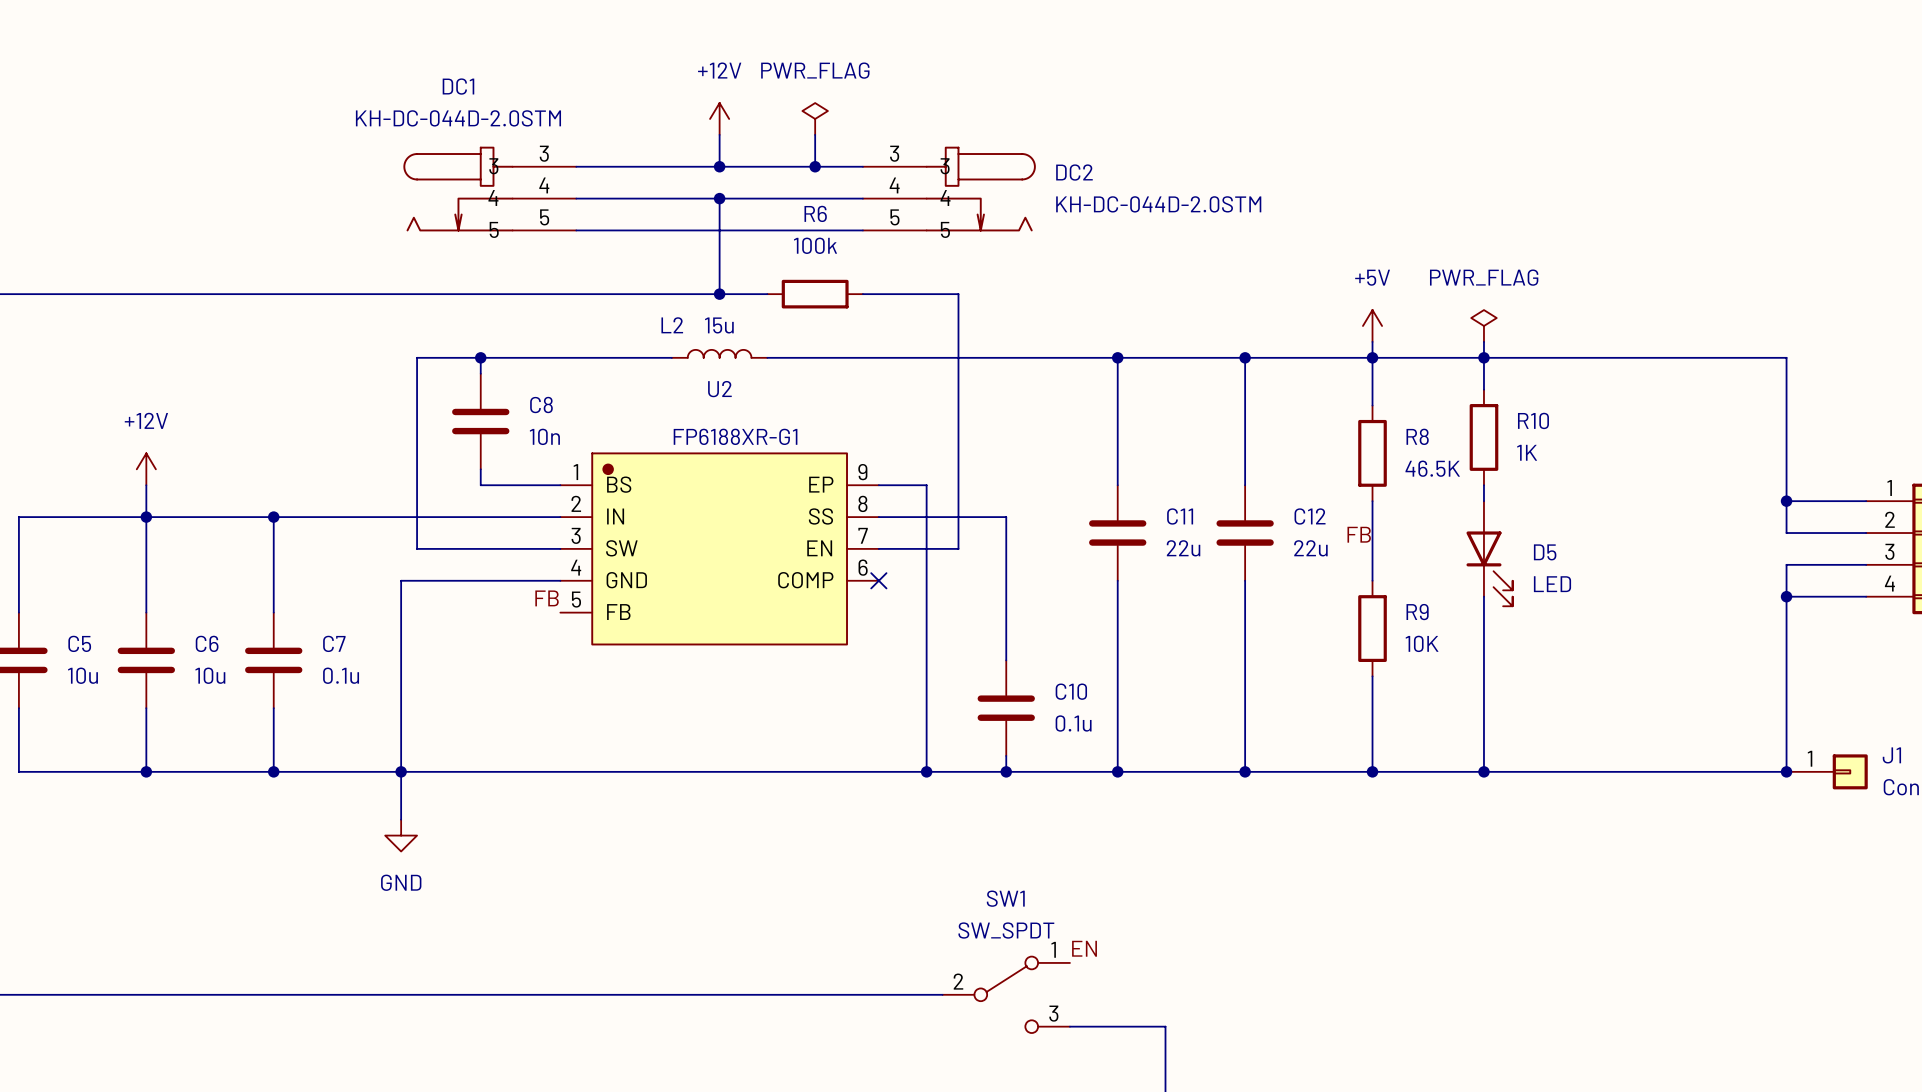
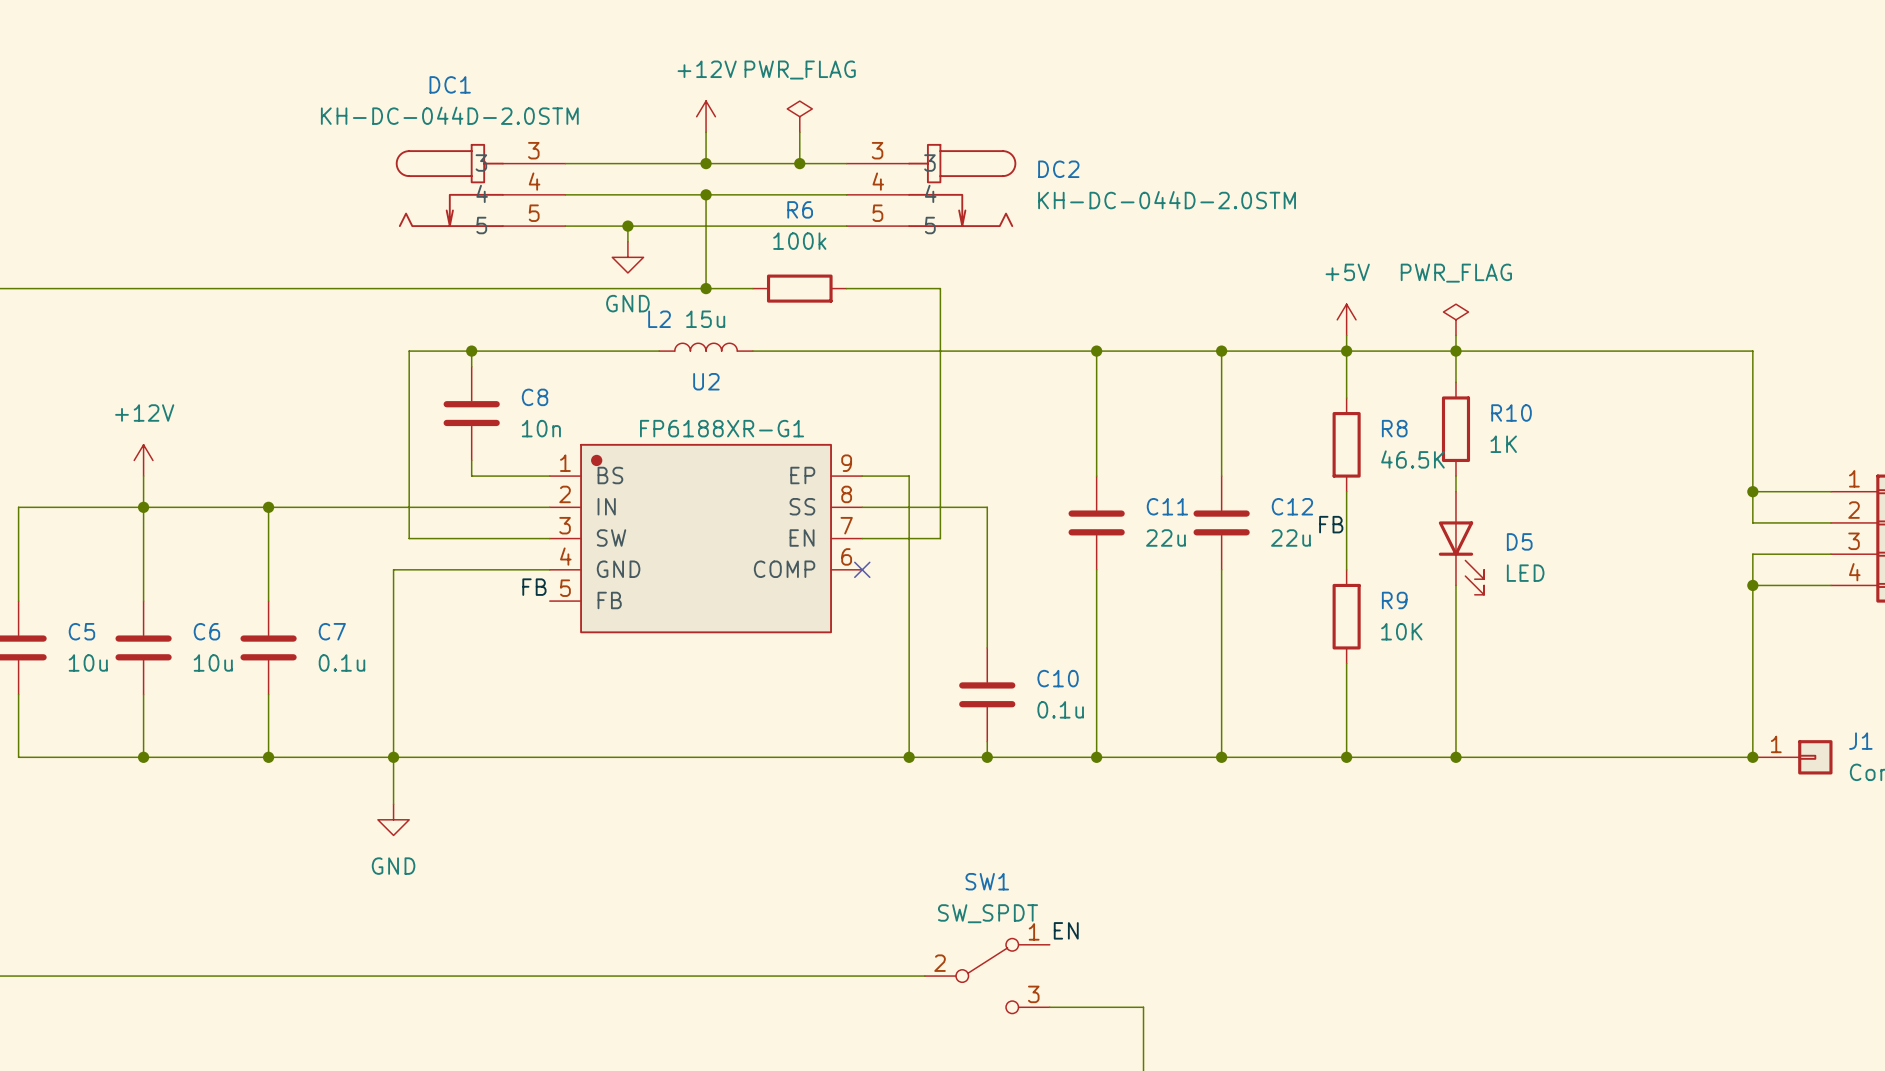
wire: none -> (627, 226) (627, 241)
junction: none -> (627, 226)
power symbol: none -> GND (627, 257)

